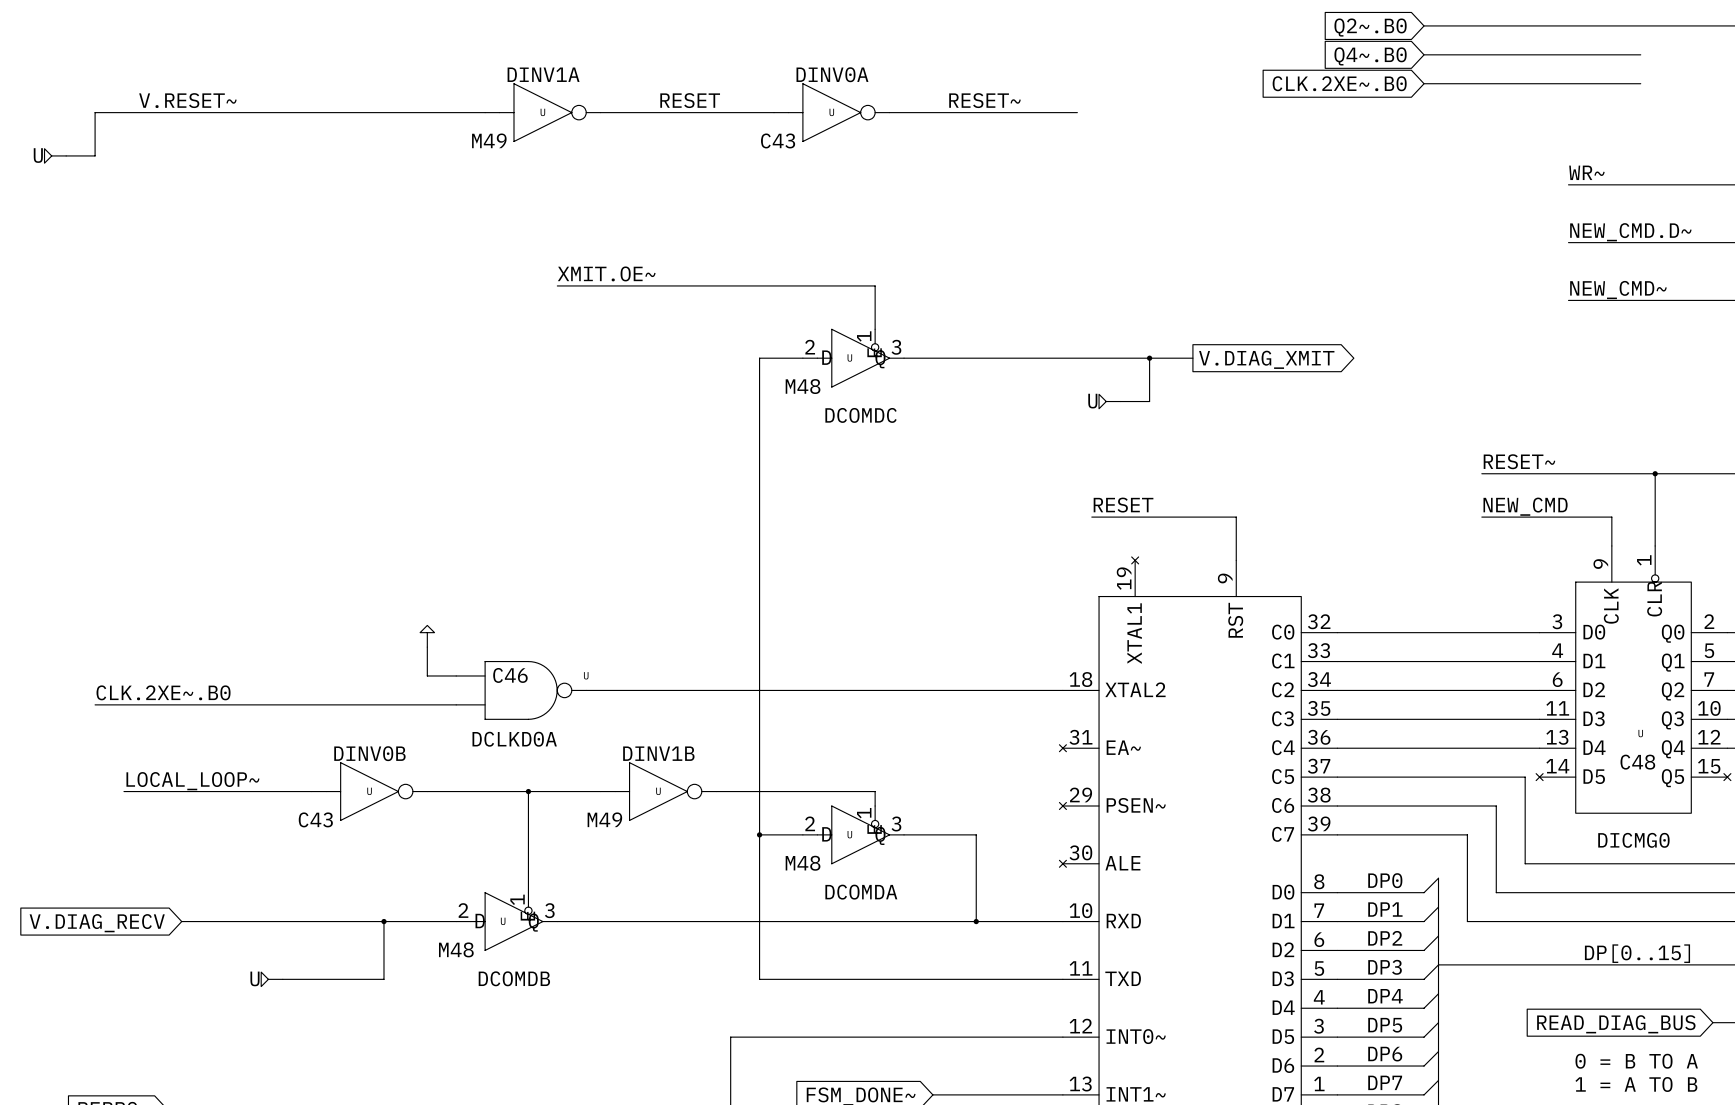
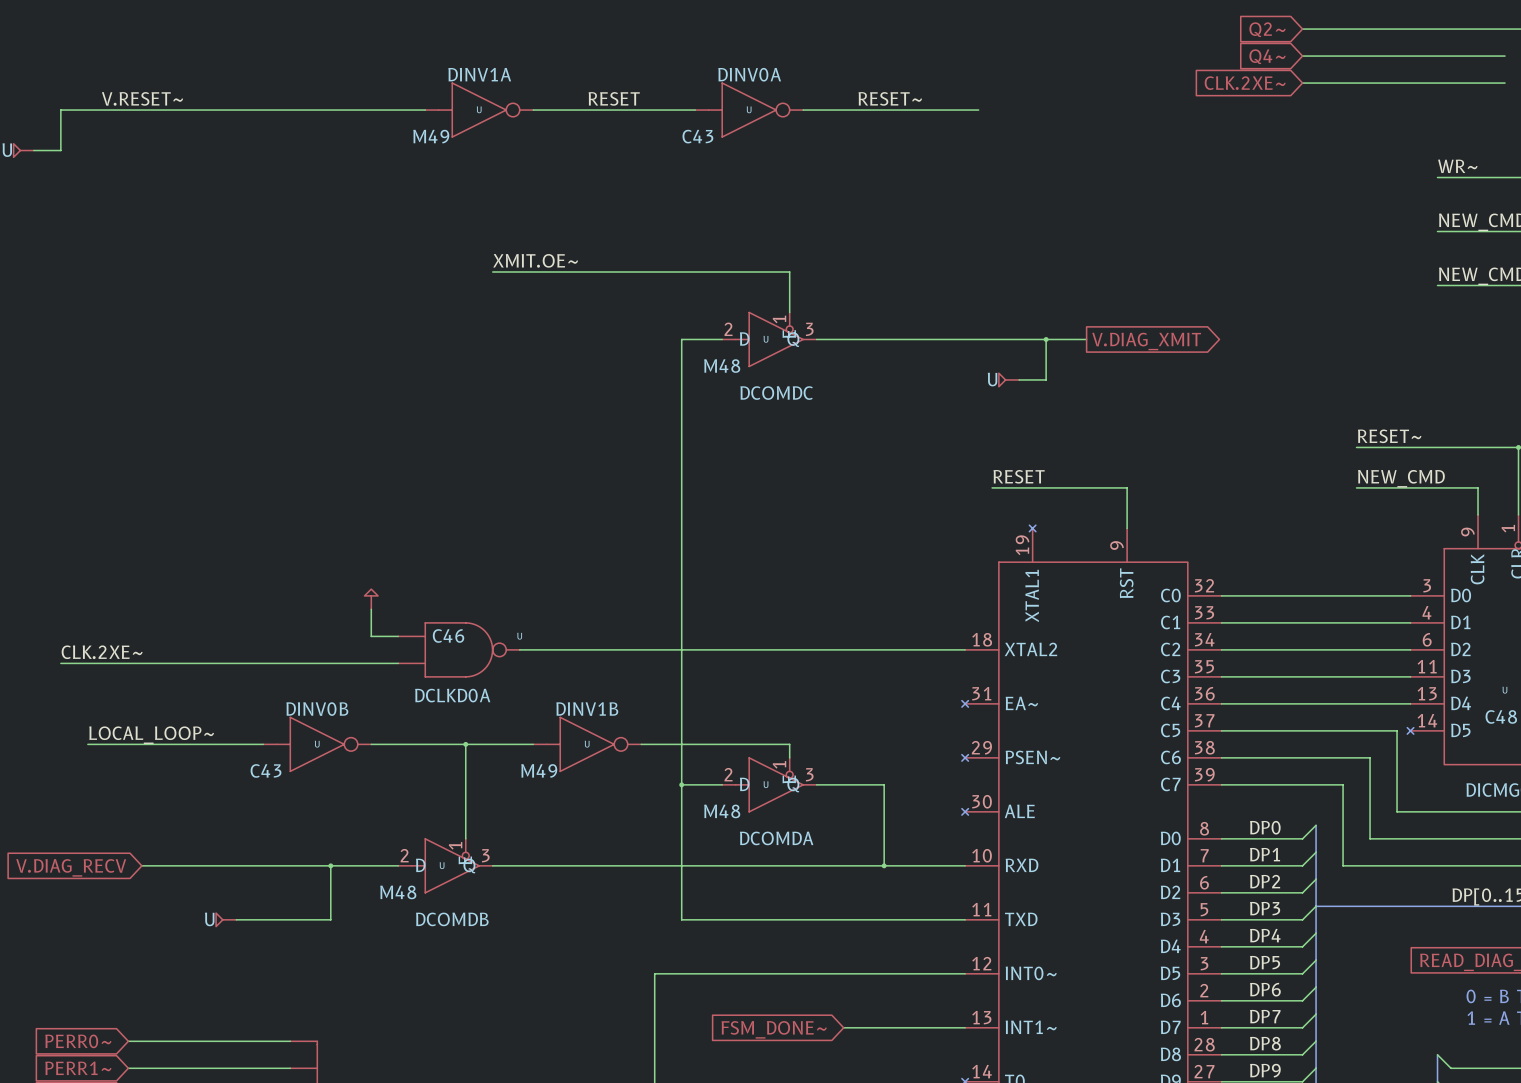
global label: Q2~.B0 (1370, 27) -> Q2~ (1267, 29)
global label: Q4~.B0 (1370, 56) -> Q4~ (1267, 56)
global label: CLK.2XE~.B0 (1339, 83) -> CLK.2XE~ (1245, 83)
label: CLK.2XE~.B0 (163, 692) -> CLK.2XE~ (102, 652)

